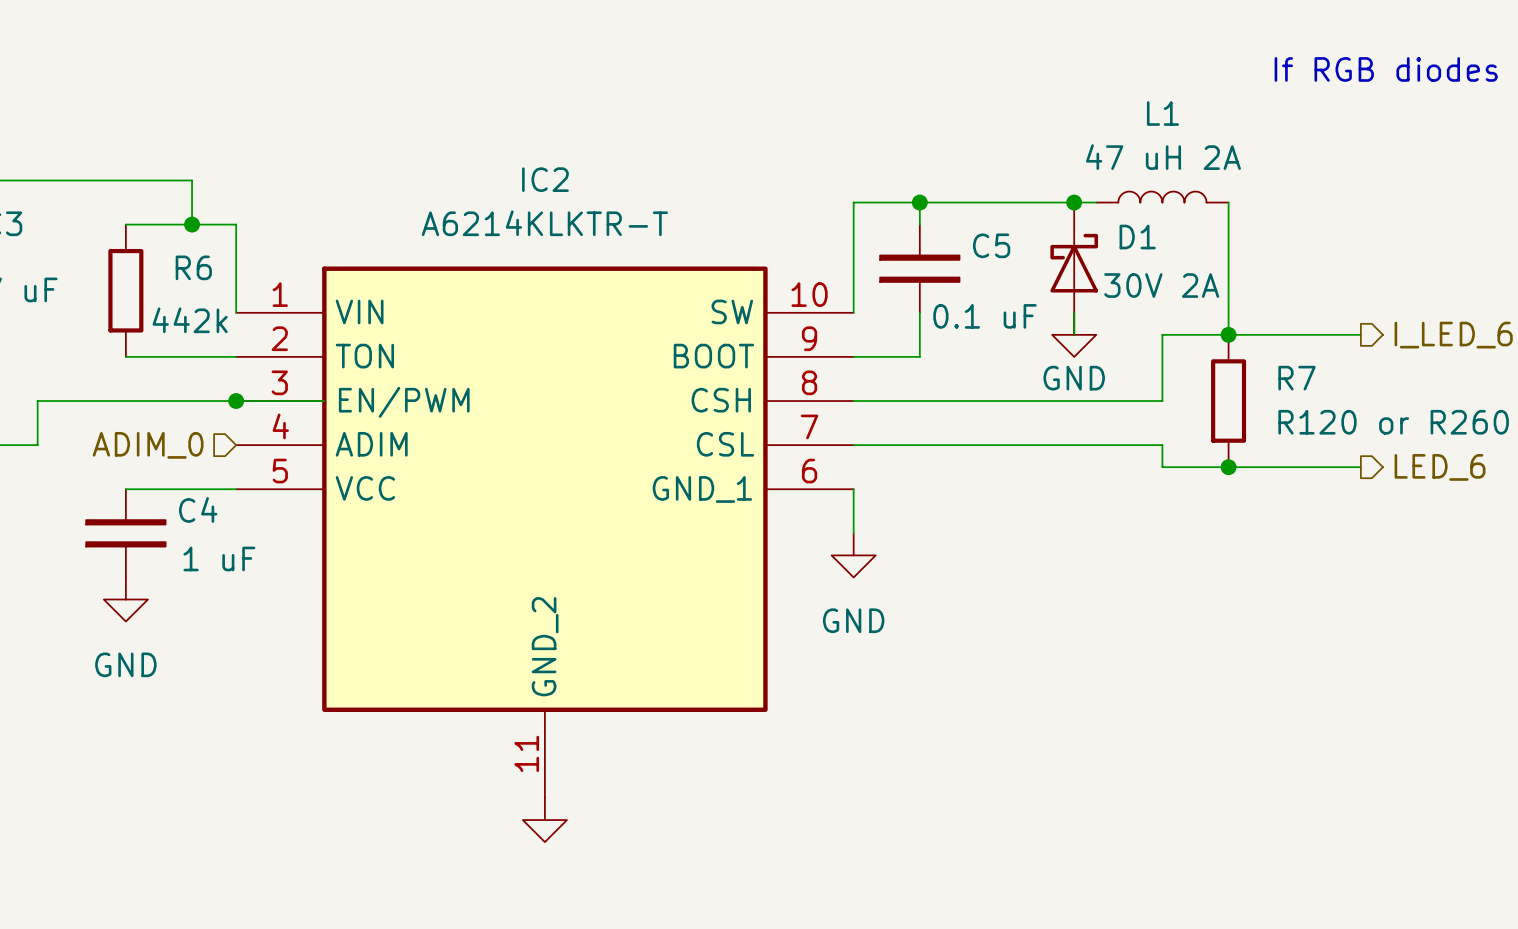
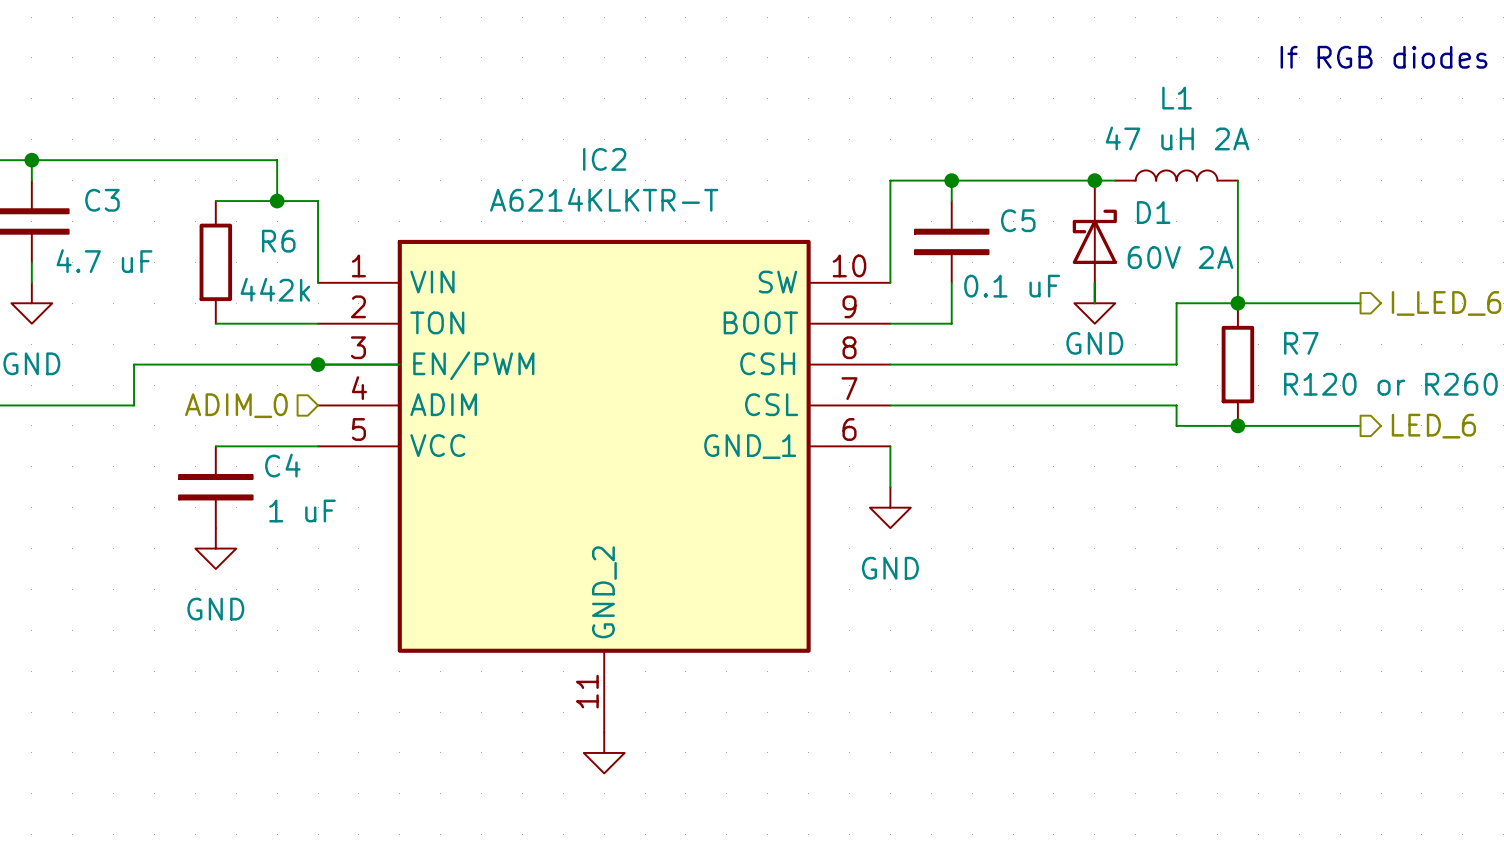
D1 value: 30V 2A (1161, 285) -> 60V 2A (1180, 257)

